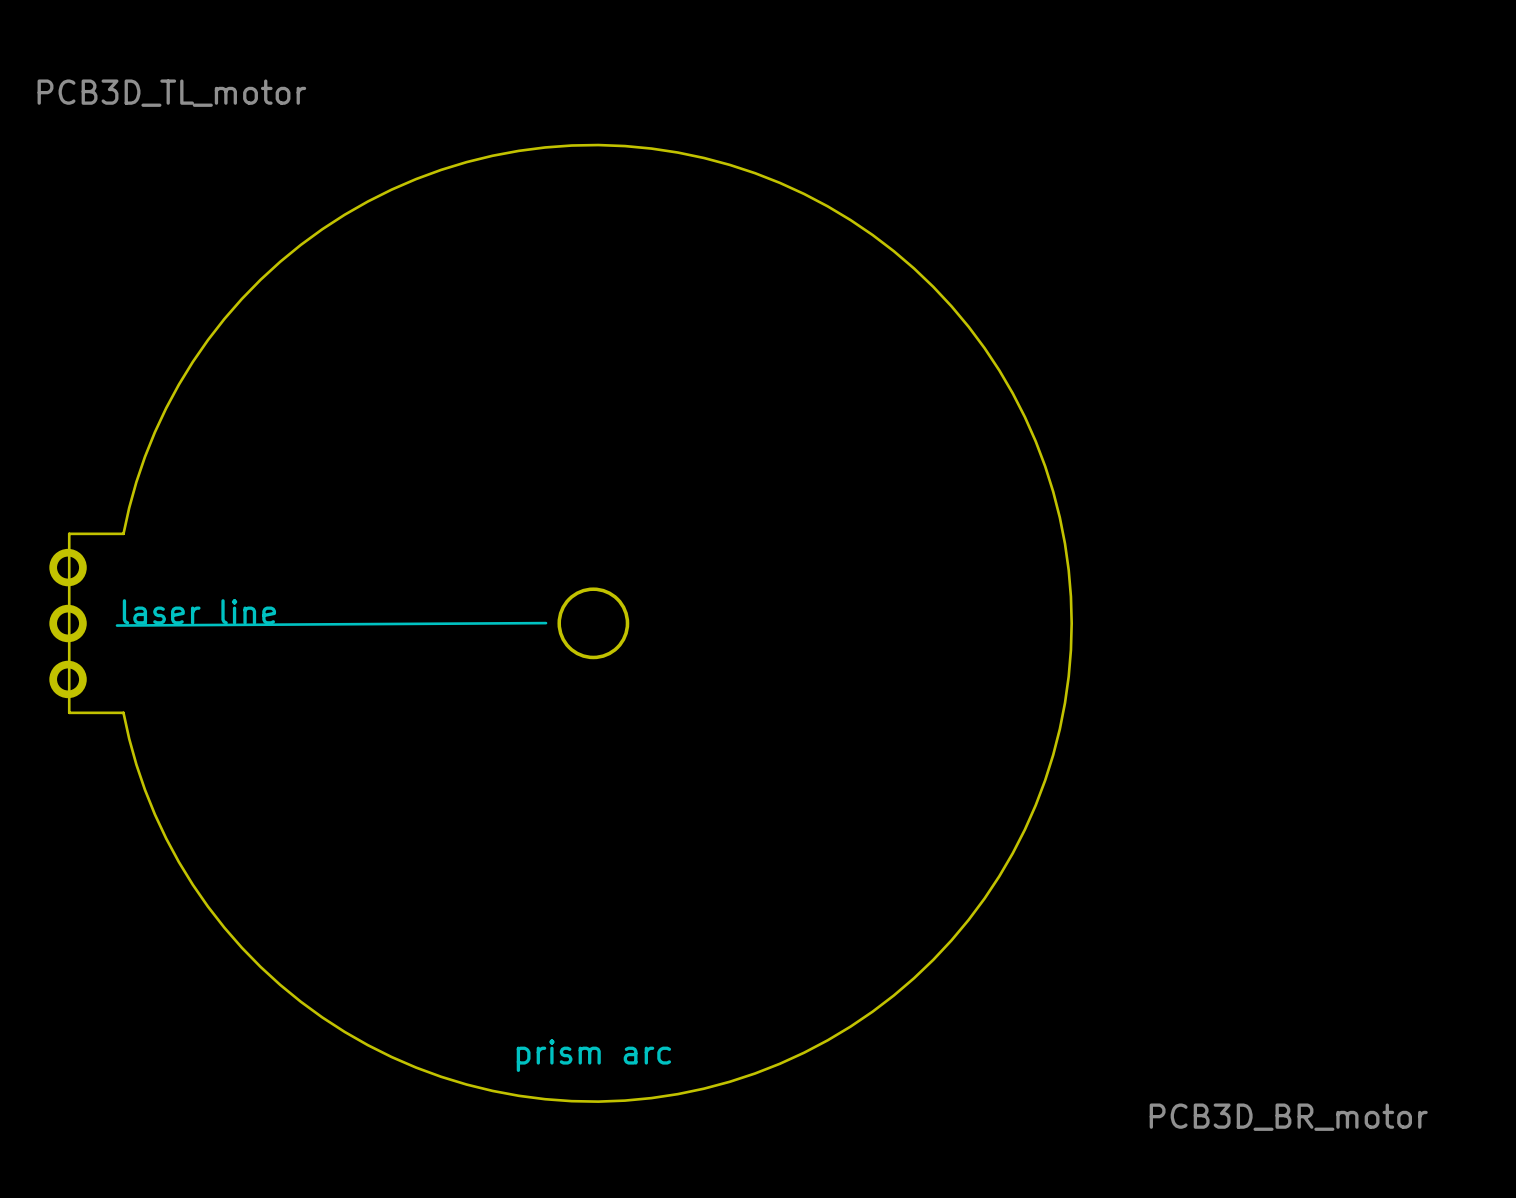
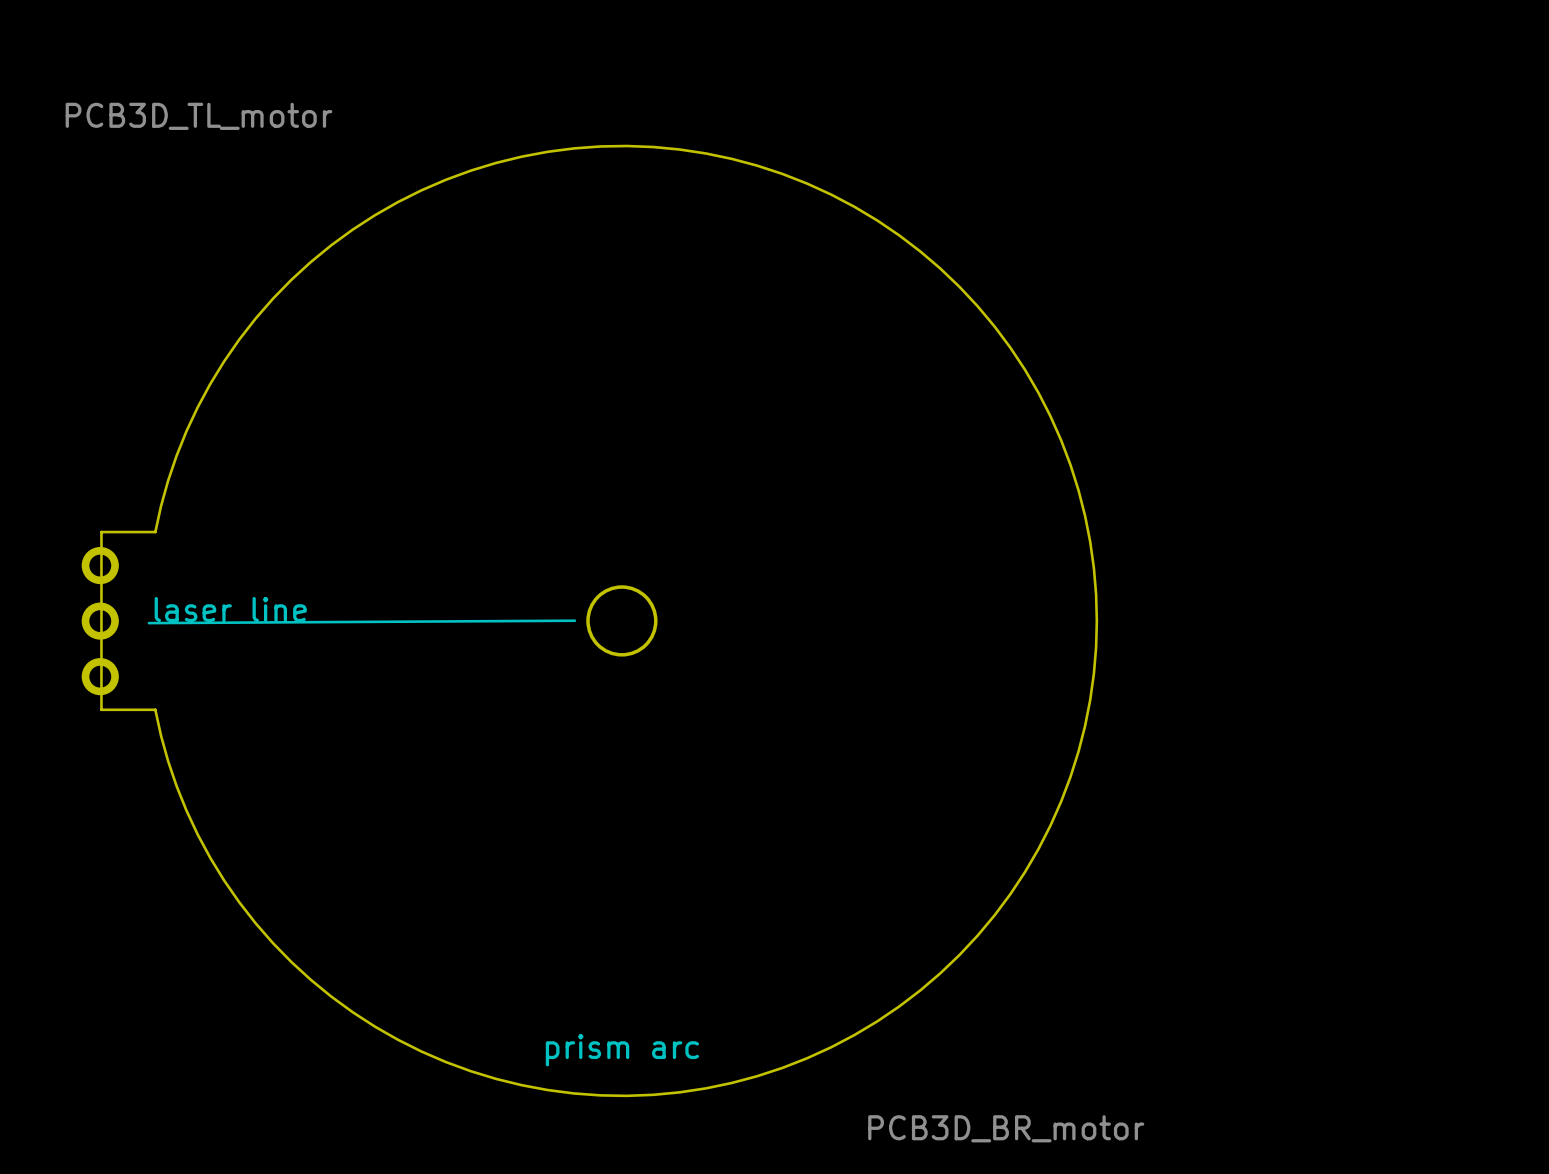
text position: PCB3D_TL_motor (171, 93) -> PCB3D_TL_motor (199, 116)
text position: PCB3D_BR_motor (1288, 1117) -> PCB3D_BR_motor (1006, 1128)

